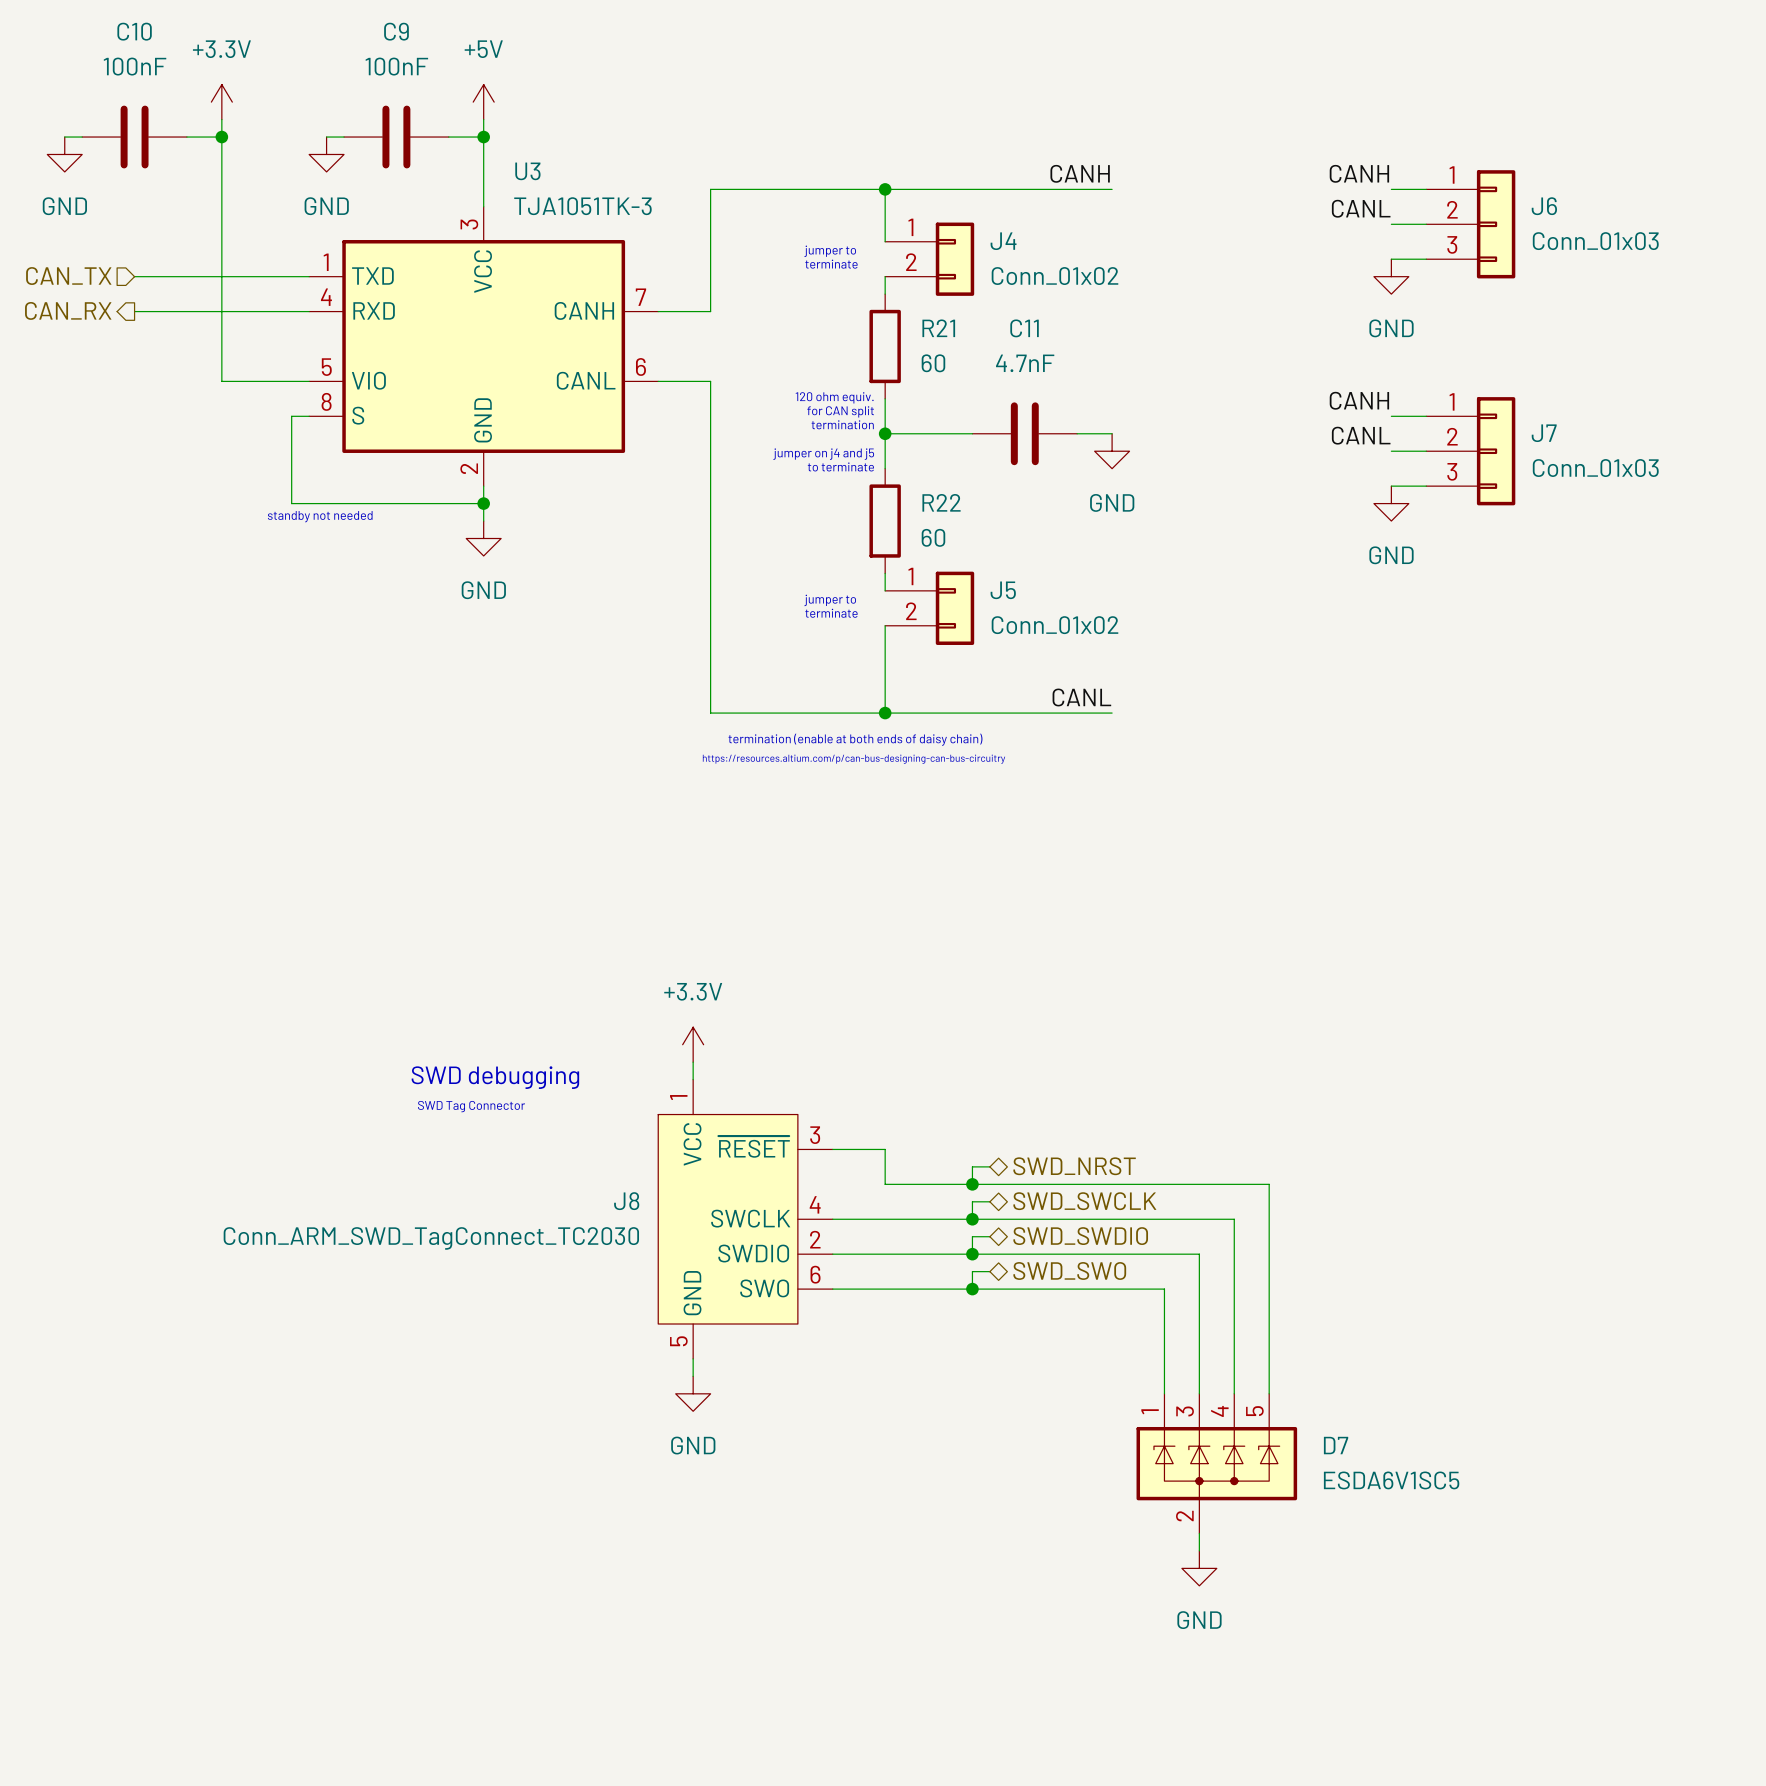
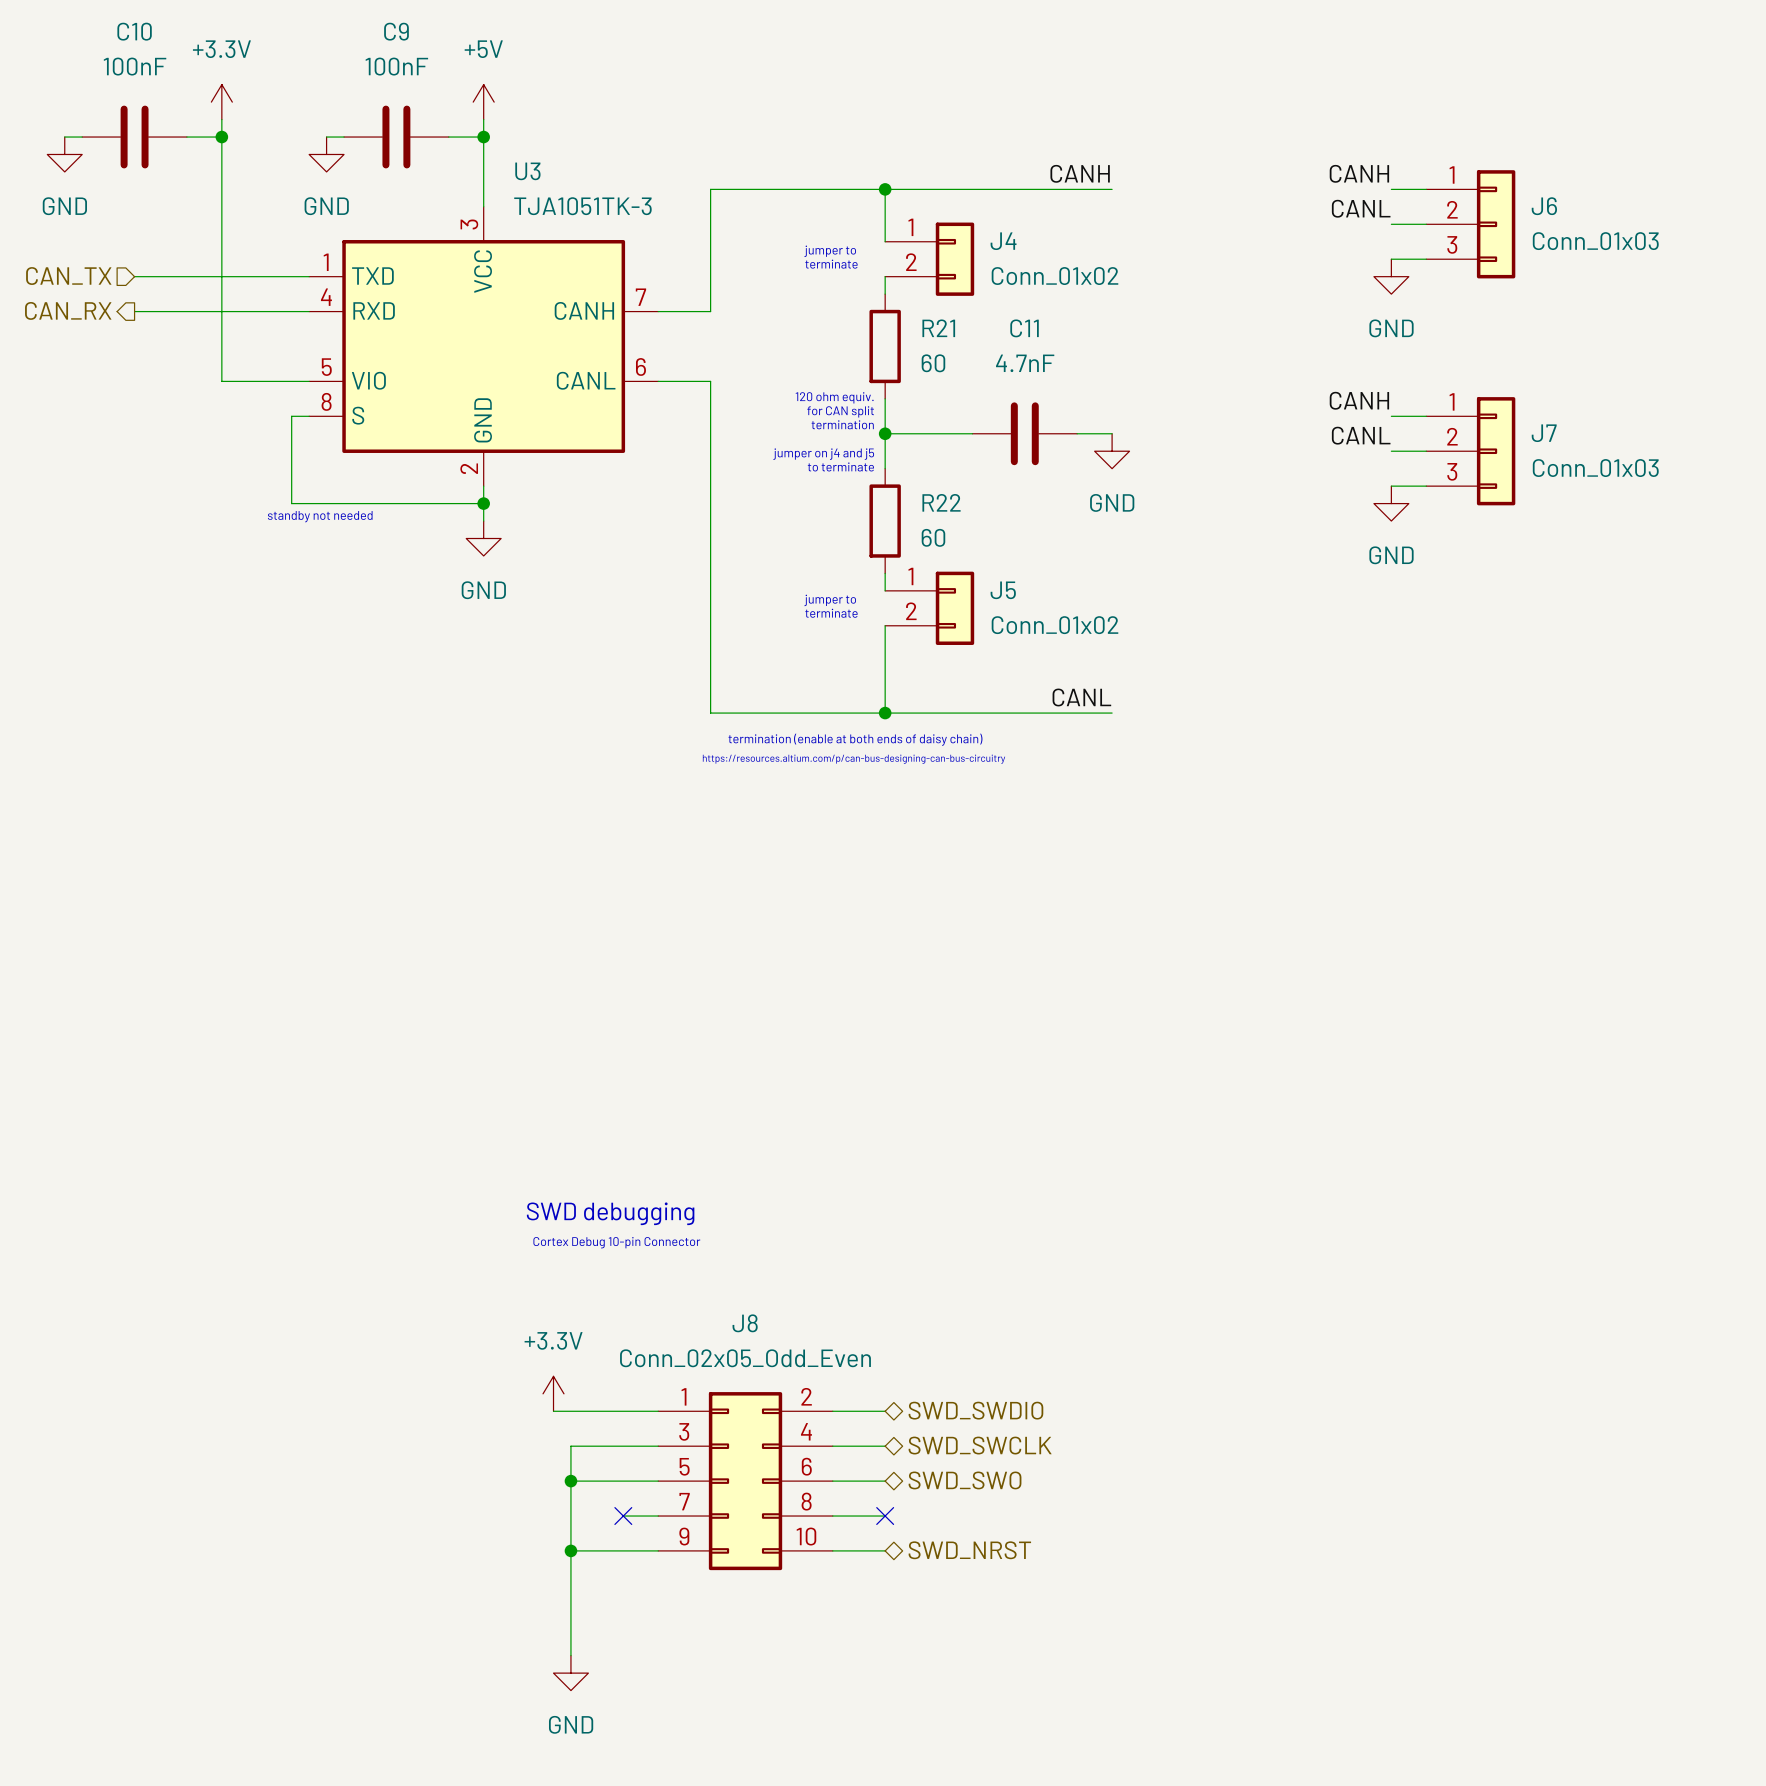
power symbol: +3.3V (693, 1044) -> none
wire: (693, 1062) (693, 1079) -> none
text position: SWD debugging (495, 1077) -> SWD debugging (610, 1213)
J8 symbol: [658, 1079, 833, 1359] -> [658, 1392, 833, 1571]
text: SWD Tag Connector (471, 1106) -> none
wire: (832, 1149) (885, 1149) (885, 1184) (1269, 1184) (1269, 1393) -> none
wire: (989, 1166) (972, 1166) (972, 1184) -> none
hierarchical label: SWD_NRST (1074, 1166) -> none
junction: (972, 1184) -> none
J8 name position: J8 (626, 1201) -> J8 (745, 1323)
wire: (989, 1201) (972, 1201) (972, 1219) -> none
hierarchical label position: SWD_SWCLK (1084, 1201) -> SWD_SWCLK (980, 1445)
wire: (832, 1219) (1234, 1219) (1234, 1393) -> none
junction: (972, 1219) -> none
wire: (989, 1236) (972, 1236) (972, 1254) -> none
hierarchical label position: SWD_SWDIO (1080, 1236) -> SWD_SWDIO (975, 1410)
J8 value: Conn_ARM_SWD_TagConnect_TC2030 (431, 1238) -> Conn_02x05_Odd_Even (745, 1358)
text: none -> Cortex Debug 10-pin Connector (616, 1242)
wire: (832, 1254) (1199, 1254) (1199, 1393) -> none
junction: (972, 1254) -> none
hierarchical label position: SWD_SWO (1069, 1270) -> SWD_SWO (965, 1480)
wire: (989, 1271) (972, 1271) (972, 1289) -> none
wire: (832, 1289) (1164, 1289) (1164, 1393) -> none
junction: (972, 1289) -> none
wire: (693, 1358) (693, 1376) -> none
power symbol: none -> +3.3V (553, 1393)
power symbol position: GND (693, 1393) -> GND (570, 1673)
wire: none -> (553, 1411) (658, 1411)
wire: none -> (832, 1411) (885, 1411)
wire: none -> (658, 1446) (570, 1446) (570, 1655)
wire: none -> (832, 1446) (885, 1446)
D7: ESDA6V1SC5 (1216, 1463) -> none
wire: none -> (570, 1481) (658, 1481)
junction: none -> (570, 1481)
wire: none -> (832, 1481) (885, 1481)
wire: none -> (623, 1516) (658, 1516)
no-connect mark: none -> (623, 1516)
wire: none -> (832, 1516) (885, 1516)
no-connect mark: none -> (885, 1516)
wire: (1199, 1533) (1199, 1550) -> none
wire: none -> (570, 1550) (658, 1550)
junction: none -> (570, 1550)
wire: none -> (832, 1550) (885, 1550)
hierarchical label: none -> SWD_NRST (969, 1550)
power symbol: GND (1199, 1568) -> none

